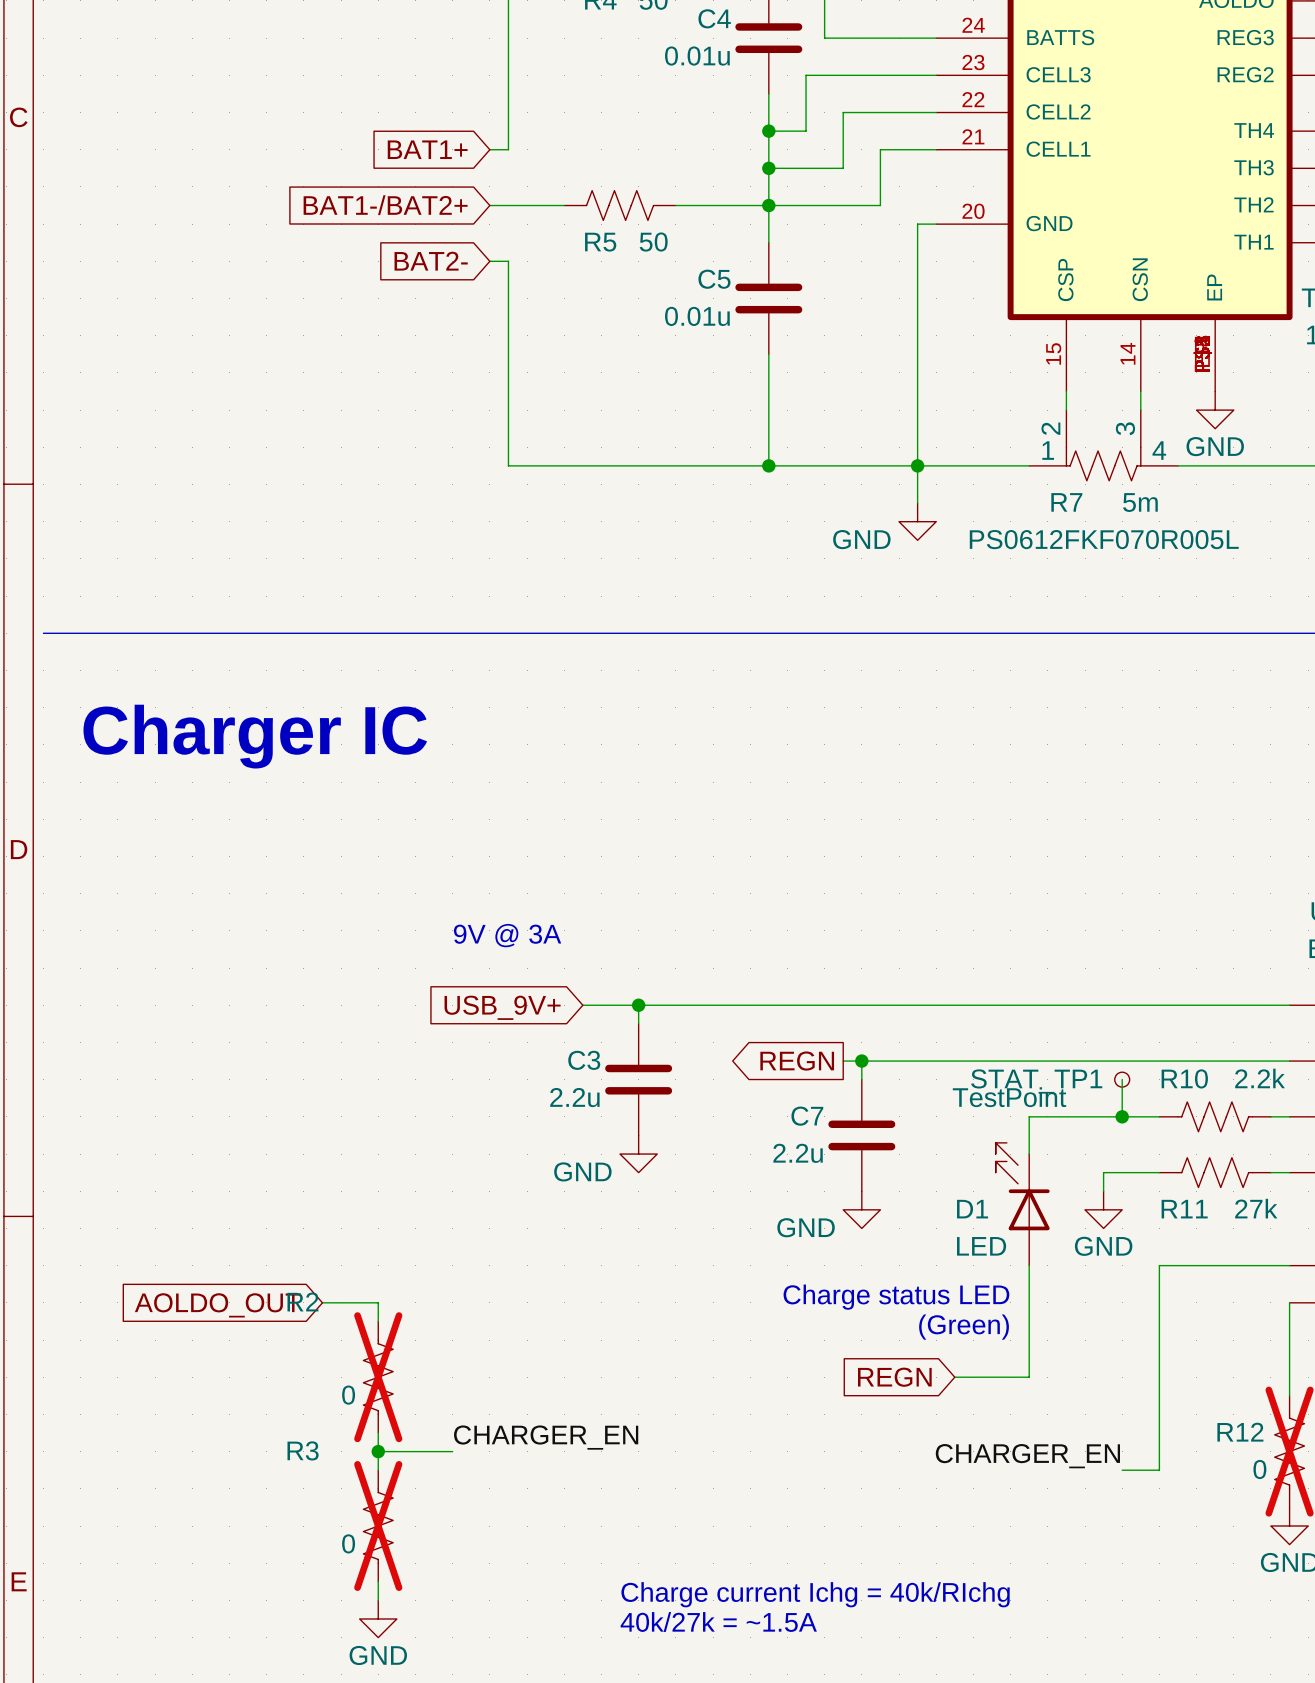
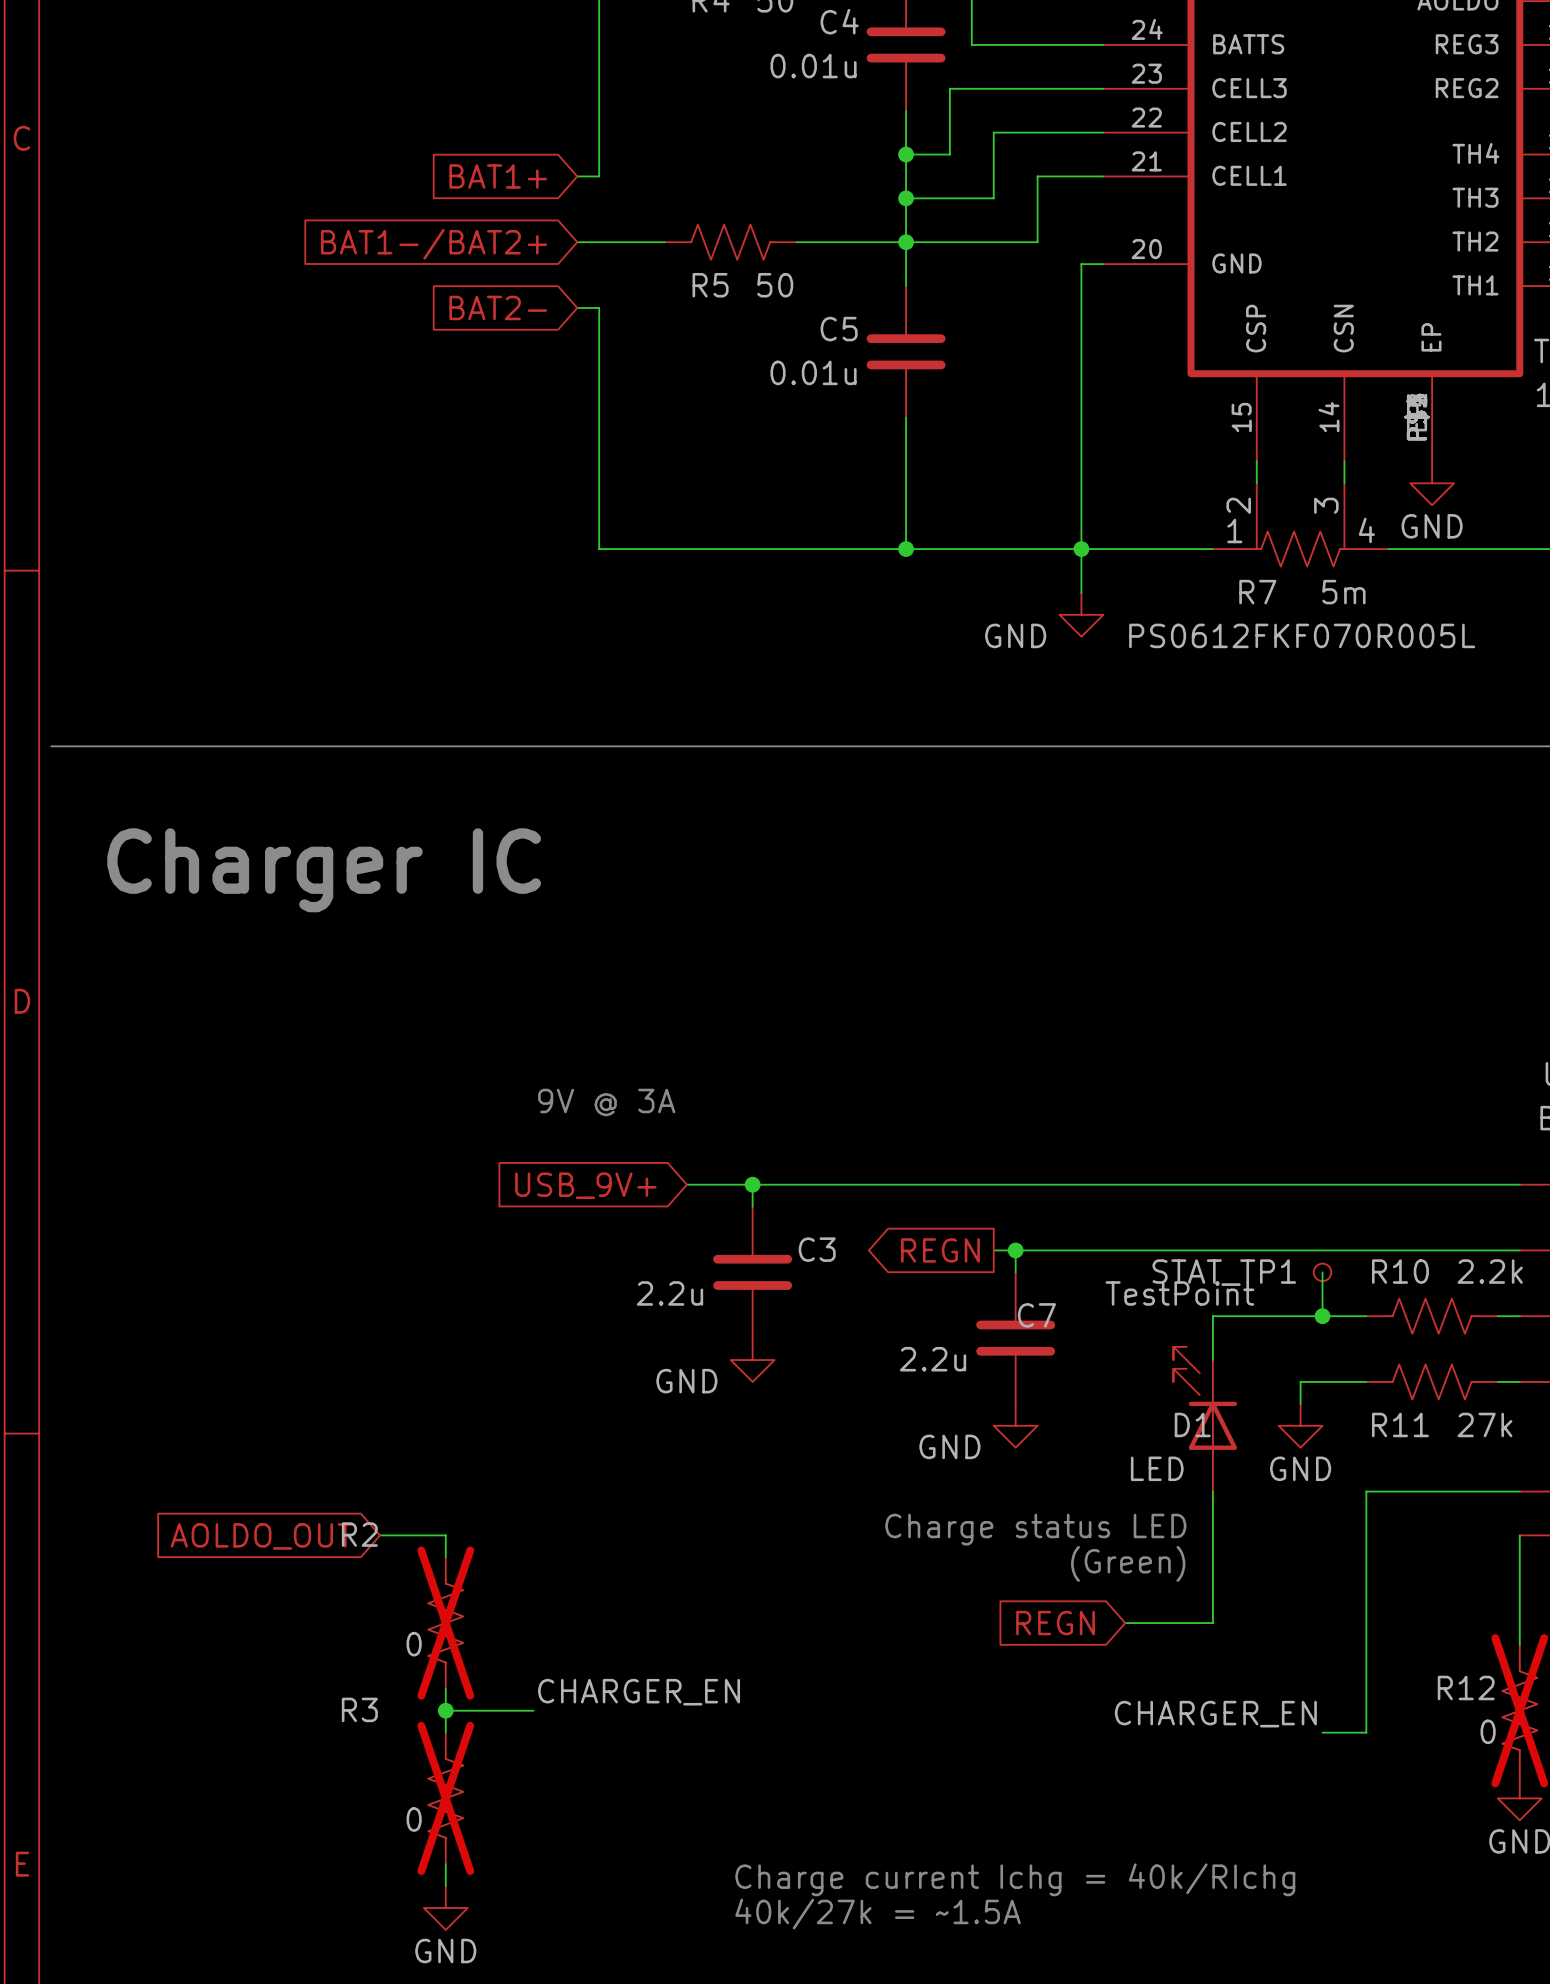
C3 name position: C3 (584, 1060) -> C3 (817, 1249)
C7 name position: C7 (807, 1116) -> C7 (1036, 1315)
D1 name position: D1 (972, 1209) -> D1 (1192, 1424)

